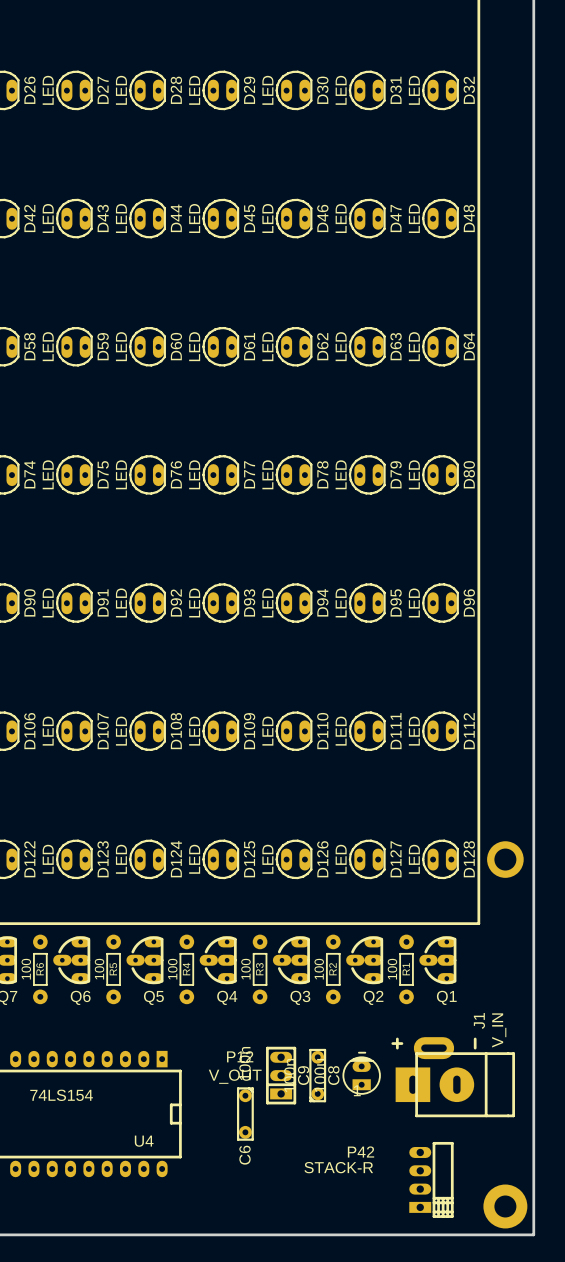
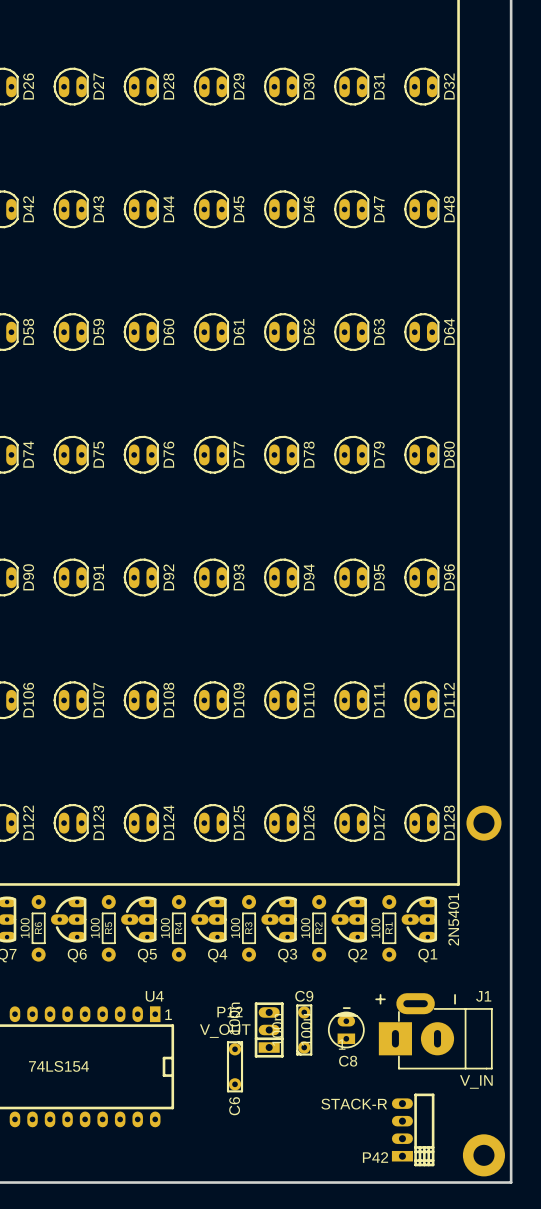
D27 value: LED (48, 90) -> none
D28 value: LED (121, 90) -> none
D29 value: LED (194, 90) -> none
D30 value: LED (267, 90) -> none
D31 value: LED (341, 90) -> none
D32 value: LED (414, 90) -> none
D43 value: LED (48, 218) -> none
D44 value: LED (121, 218) -> none
D45 value: LED (194, 218) -> none
D46 value: LED (267, 218) -> none
D47 value: LED (341, 218) -> none
D48 value: LED (414, 218) -> none
D59 value: LED (48, 346) -> none
D60 value: LED (121, 346) -> none
D61 value: LED (194, 346) -> none
D62 value: LED (267, 346) -> none
D63 value: LED (341, 346) -> none
D64 value: LED (414, 346) -> none
D75 value: LED (48, 474) -> none
D76 value: LED (121, 474) -> none
D77 value: LED (194, 474) -> none
D78 value: LED (267, 474) -> none
D79 value: LED (341, 474) -> none
D80 value: LED (414, 474) -> none
D91 value: LED (48, 602) -> none
D92 value: LED (121, 602) -> none
D93 value: LED (194, 602) -> none
D94 value: LED (267, 602) -> none
D95 value: LED (341, 602) -> none
D96 value: LED (414, 602) -> none
D107 value: LED (48, 731) -> none
D108 value: LED (121, 731) -> none
D109 value: LED (194, 731) -> none
D110 value: LED (267, 731) -> none
D111 value: LED (341, 731) -> none
D112 value: LED (414, 731) -> none
D123 value: LED (48, 859) -> none
D124 value: LED (121, 859) -> none
D125 value: LED (194, 859) -> none
D126 value: LED (267, 859) -> none
D127 value: LED (341, 859) -> none
D128 value: LED (414, 859) -> none
Q1 value: none -> 2N5401 (453, 919)
J1 name position: J1 (479, 1020) -> J1 (483, 996)
J1 value position: V_IN (499, 1030) -> V_IN (476, 1081)
J1 footprint: [391, 1037, 516, 1118] -> [375, 993, 493, 1070]
text: none -> 1 (168, 1014)
C9 name rotation: 0° (303, 1075) -> 90° clockwise (304, 996)
C9 name position: C9 (303, 1075) -> C9 (304, 996)
C8 name rotation: 0° (333, 1075) -> 90° clockwise (348, 1061)
C8 name position: C8 (333, 1075) -> C8 (348, 1061)
U4 value position: 74LS154 (61, 1095) -> 74LS154 (58, 1066)
U4 name position: U4 (144, 1141) -> U4 (154, 996)
P42 name position: P42 (361, 1151) -> P42 (375, 1157)
P42 value position: STACK-R (338, 1167) -> STACK-R (354, 1104)

